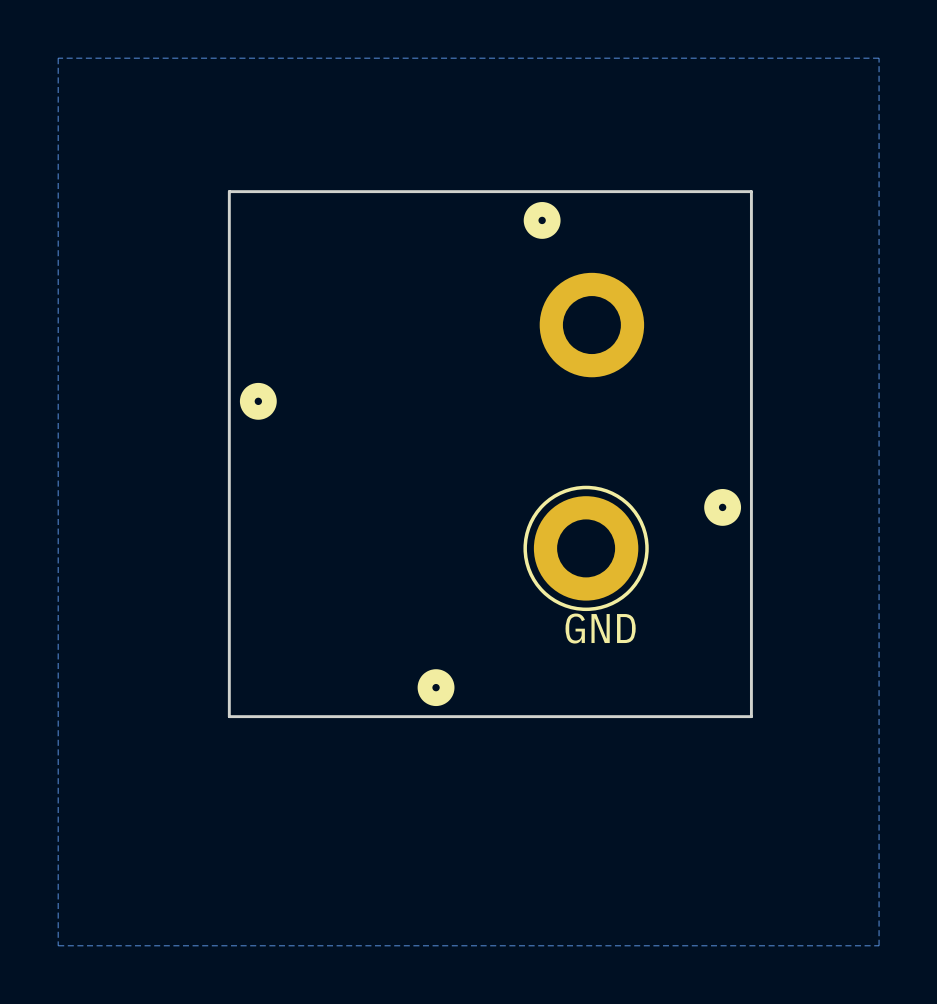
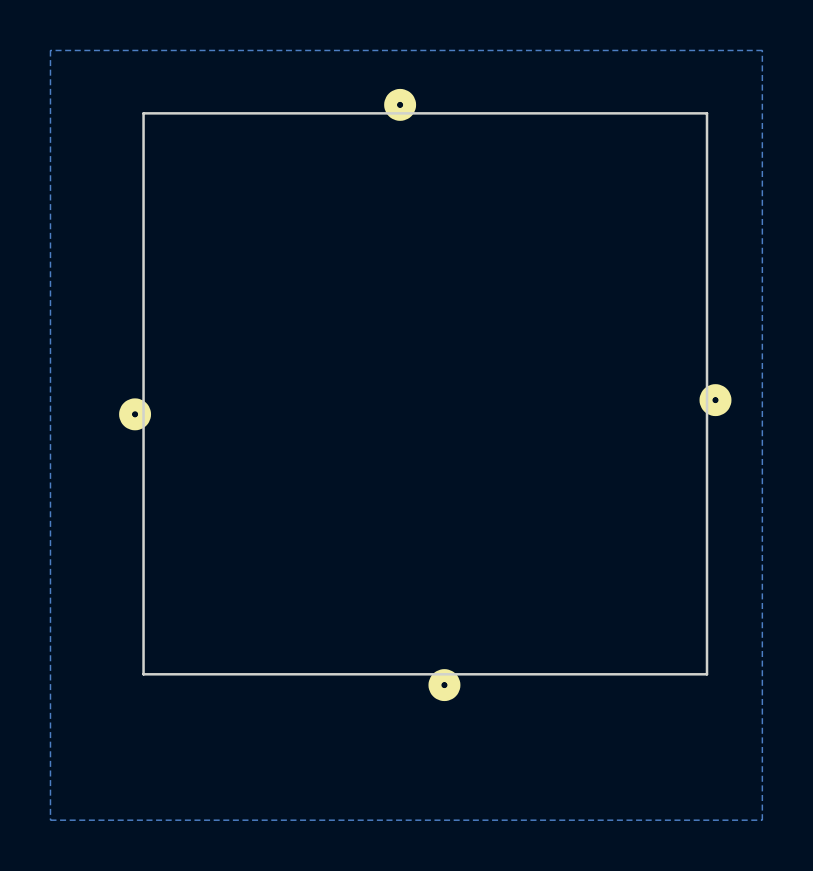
board edge: (751, 191) (229, 191) (229, 716) (751, 716) (751, 191) -> (707, 113) (707, 674) (143, 674) (143, 113) (707, 113)
part position: (542, 220) -> (400, 104)
part: (591, 325) -> none
part position: (258, 401) -> (135, 414)
part position: (722, 507) -> (715, 400)
GND: (586, 548) -> none
part position: (436, 687) -> (444, 685)

